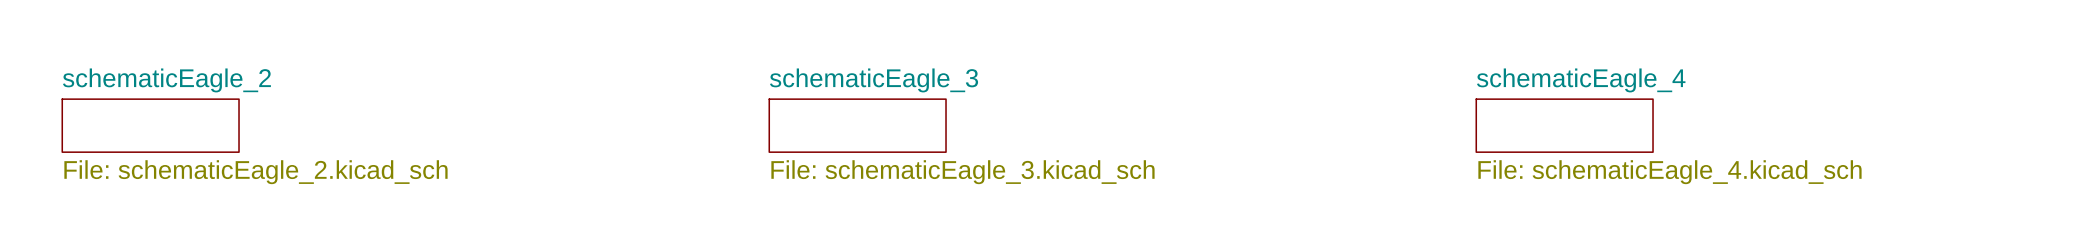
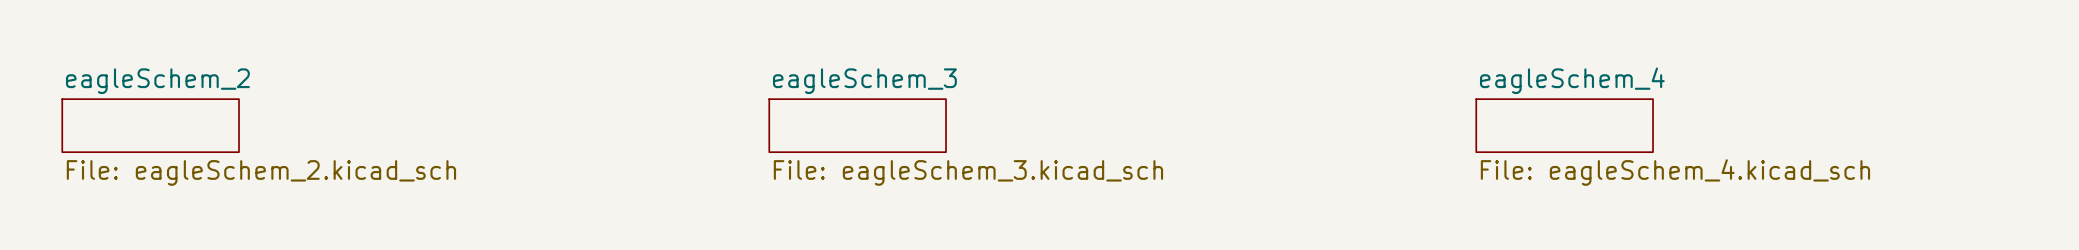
sheet schematicEagle_2 name: schematicEagle_2 (166, 80) -> eagleSchem_2 (157, 81)
sheet schematicEagle_3 name: schematicEagle_3 (874, 80) -> eagleSchem_3 (864, 81)
sheet schematicEagle_4 name: schematicEagle_4 (1581, 80) -> eagleSchem_4 (1572, 80)
sheet schematicEagle_2 value: File: schematicEagle_2.kicad_sch (255, 172) -> File: eagleSchem_2.kicad_sch (261, 172)
sheet schematicEagle_3 value: File: schematicEagle_3.kicad_sch (962, 172) -> File: eagleSchem_3.kicad_sch (968, 172)
sheet schematicEagle_4 value: File: schematicEagle_4.kicad_sch (1669, 172) -> File: eagleSchem_4.kicad_sch (1675, 172)

